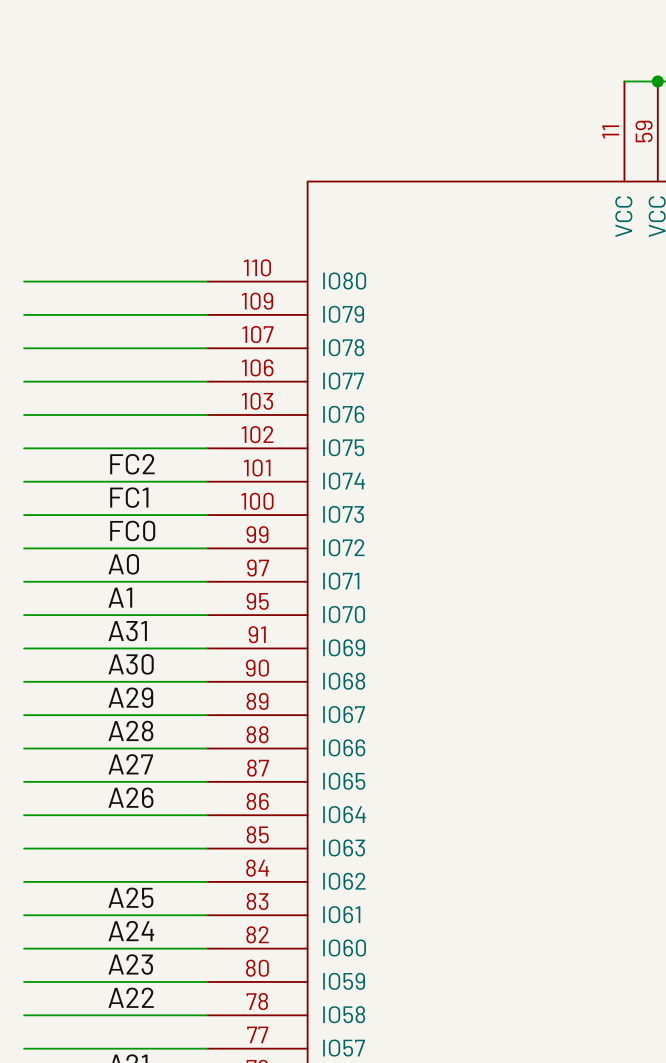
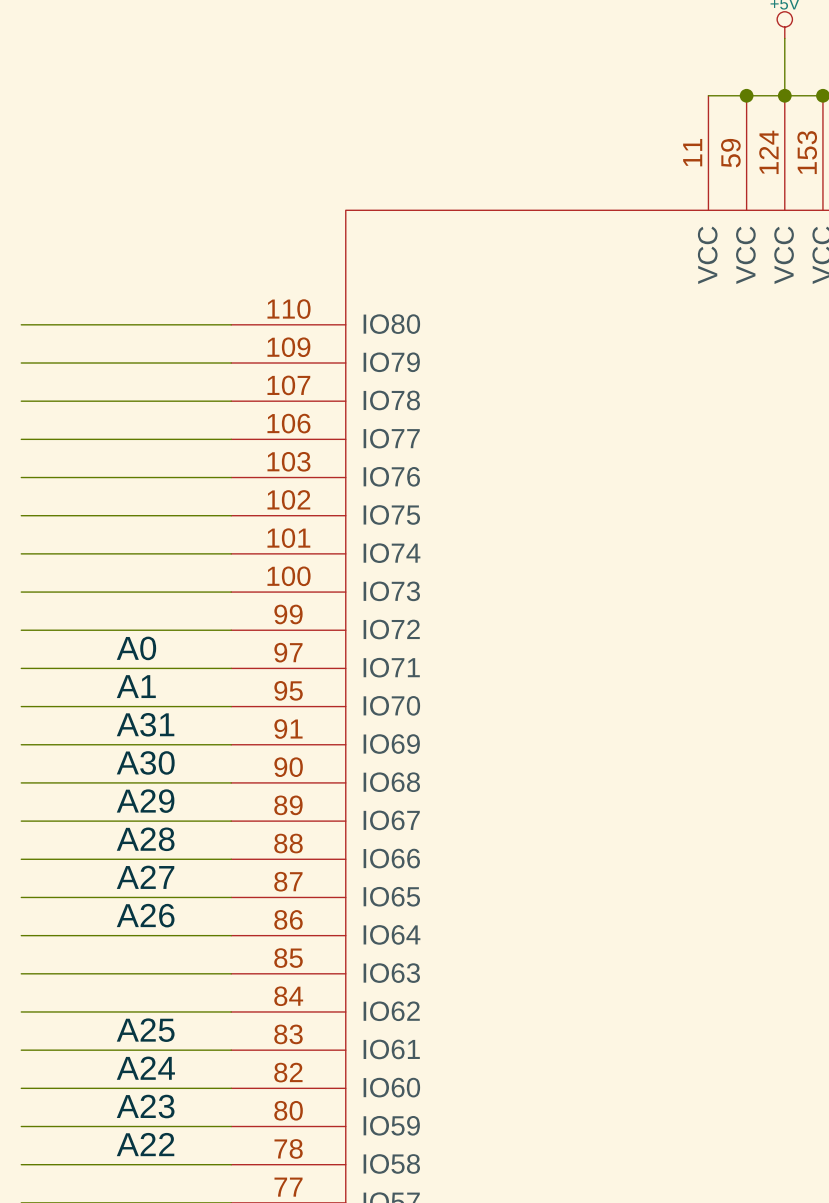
label: FC2 (132, 464) -> none
label: FC1 (129, 497) -> none
label: FC0 (132, 530) -> none

